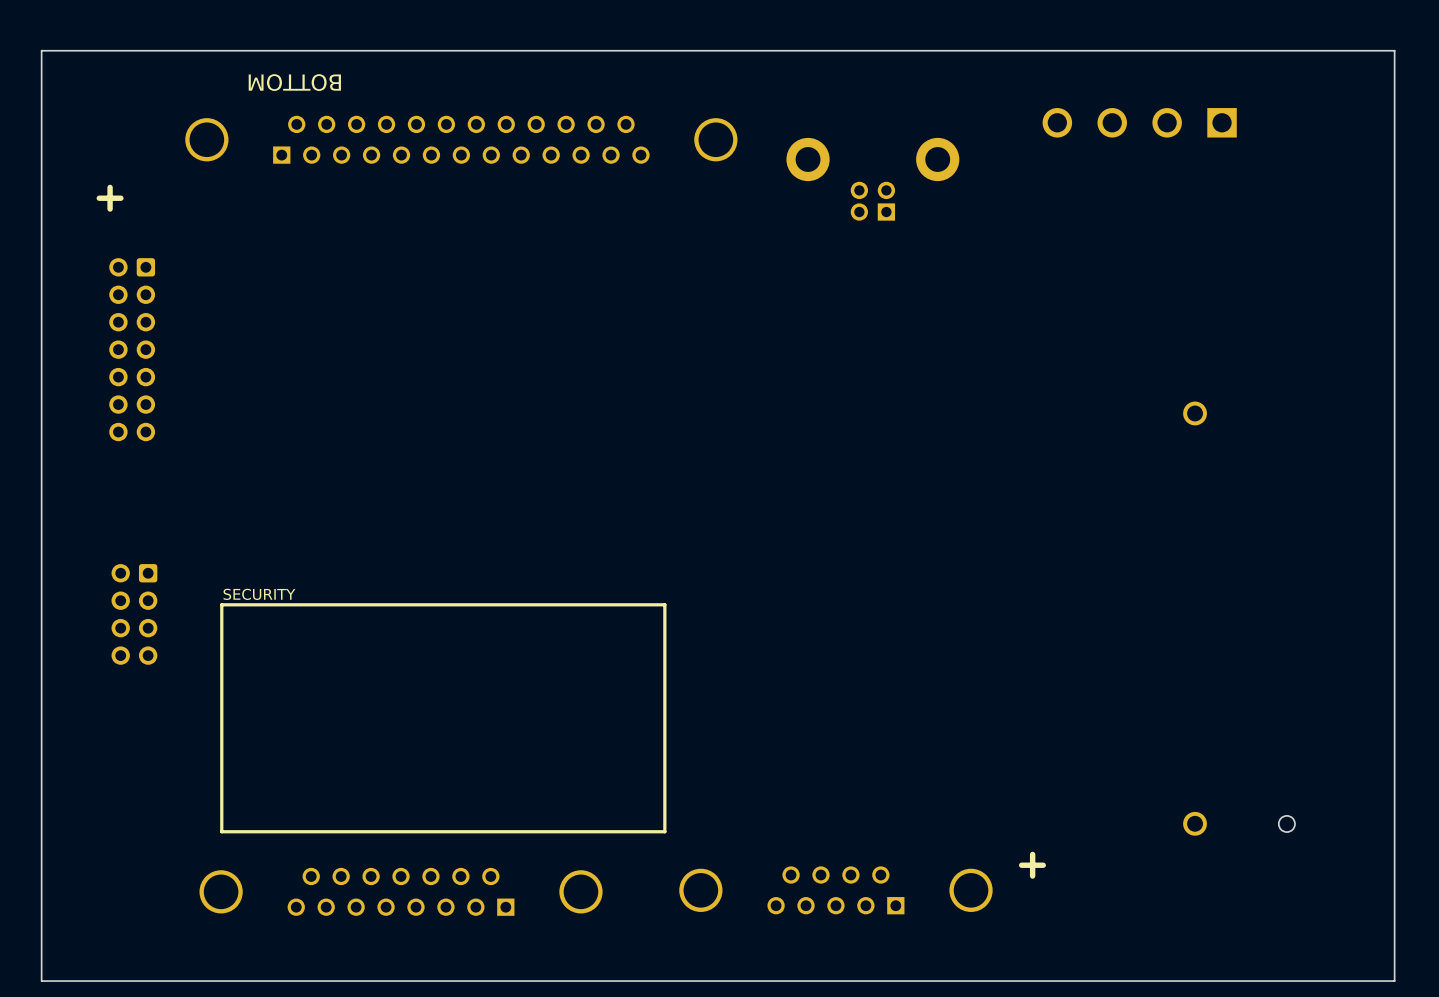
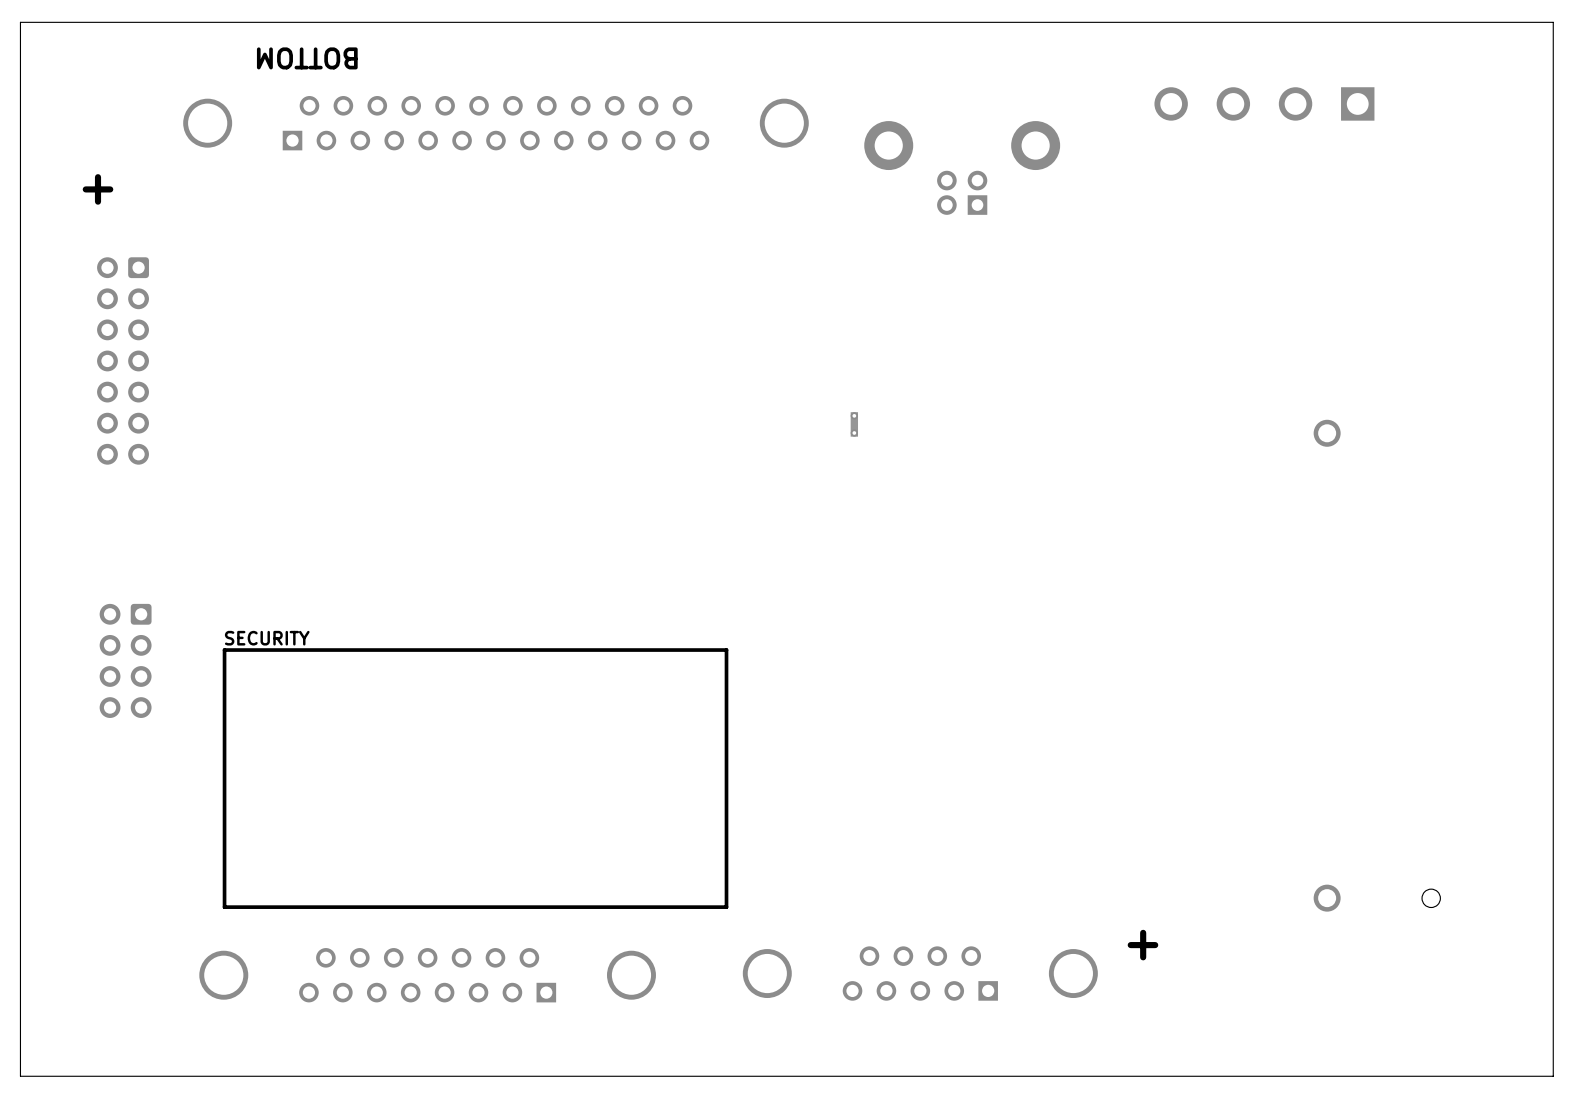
part: none -> (854, 424)

